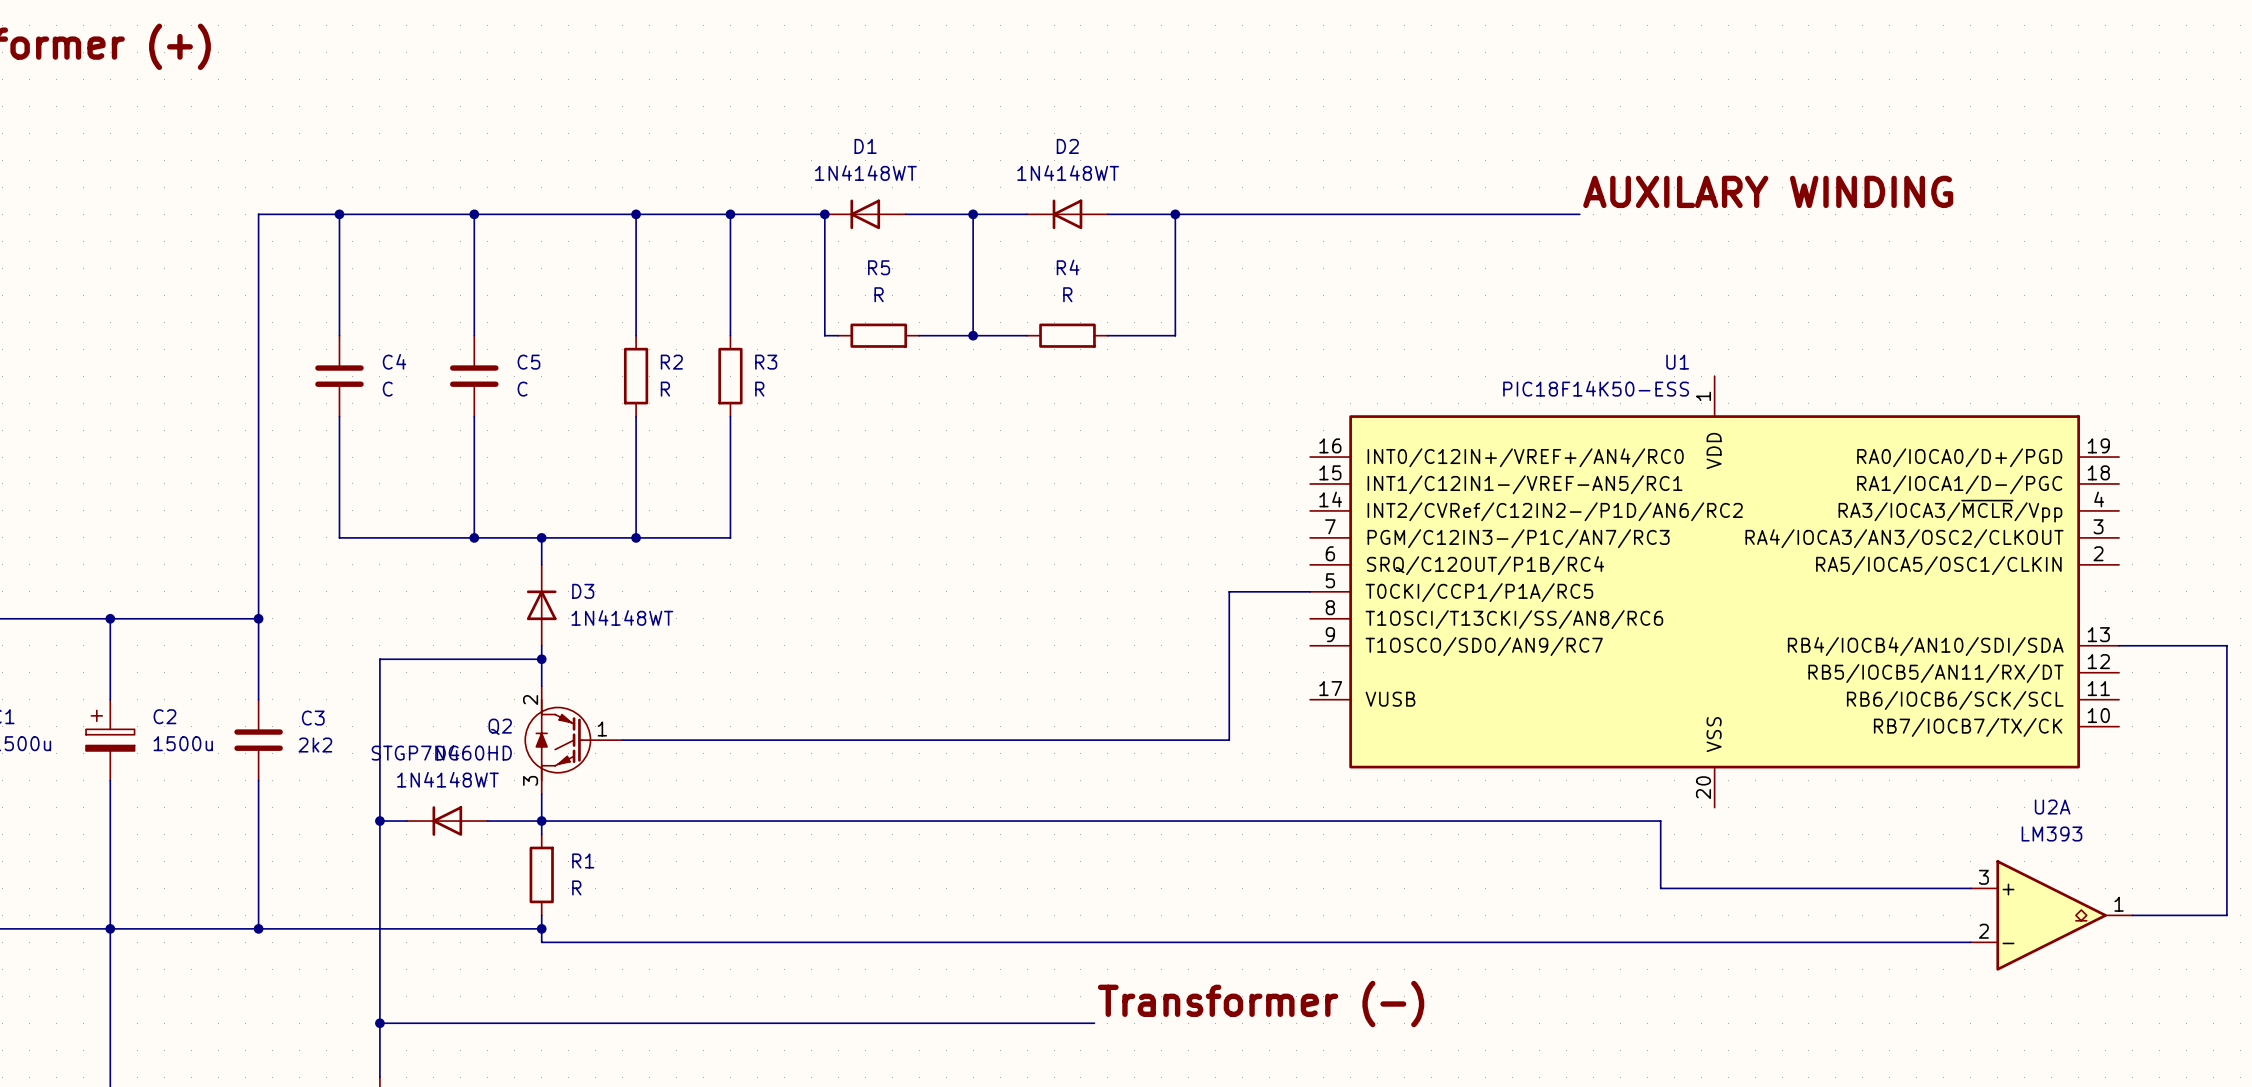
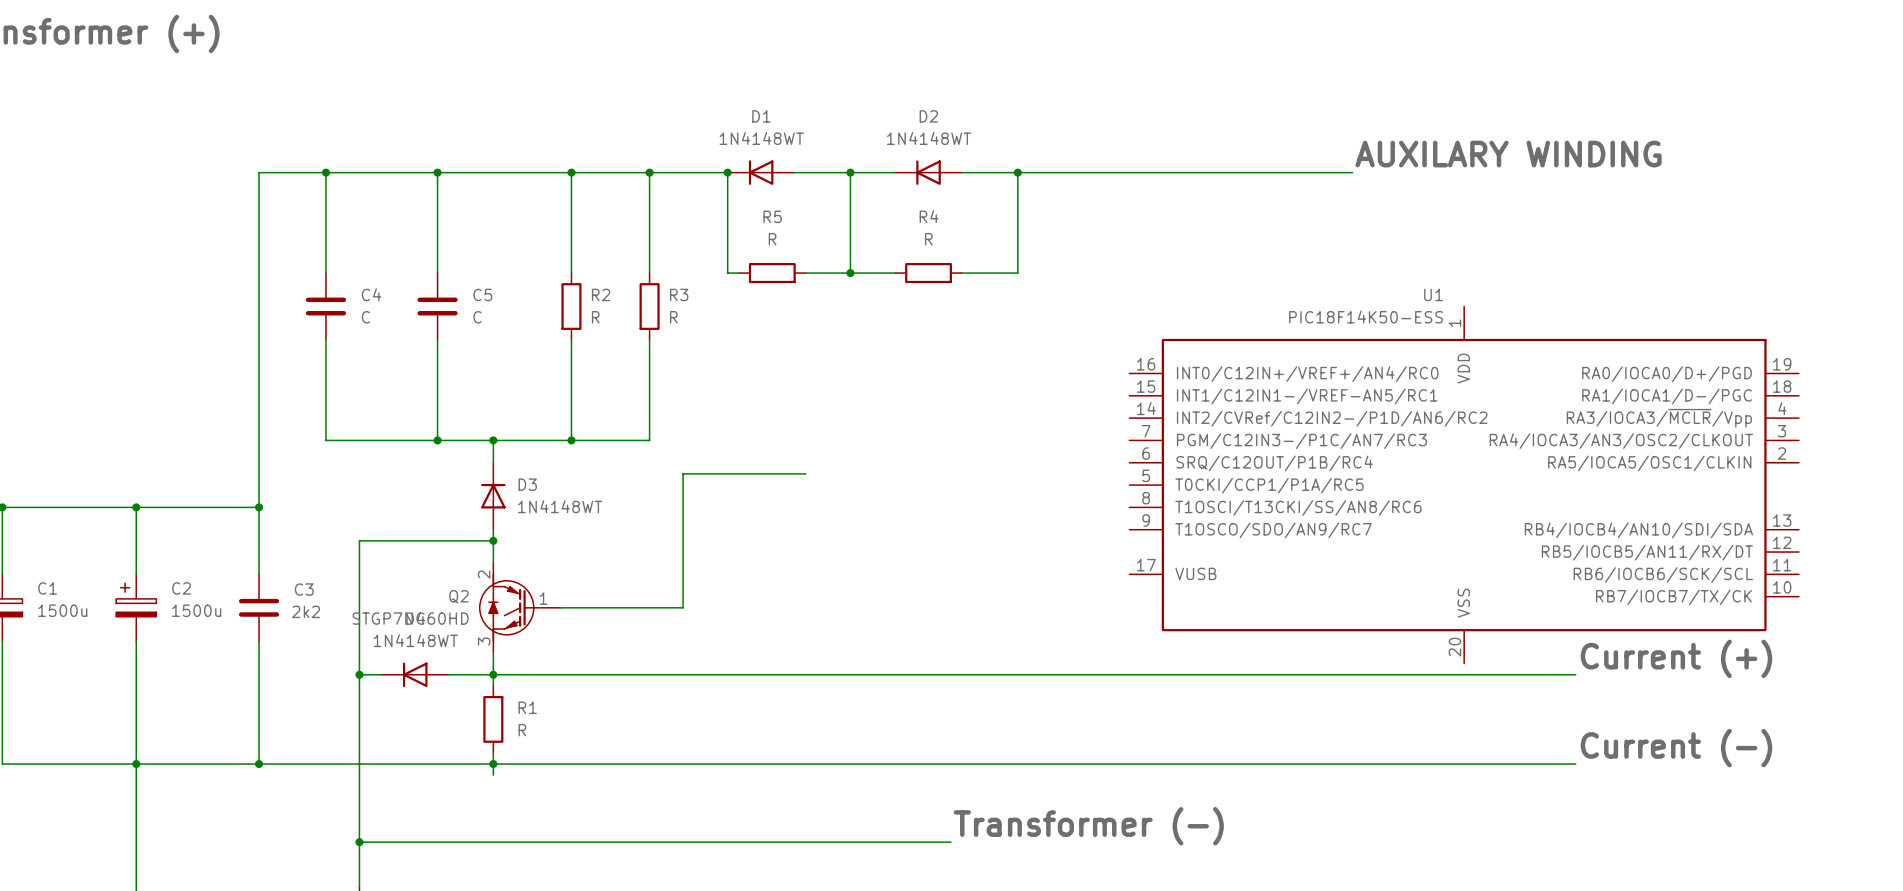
wire: (1310, 591) (1229, 591) (1229, 740) (770, 740) -> (805, 473) (683, 473) (683, 607)
wire: (2119, 645) (2226, 645) (2226, 915) (2132, 915) -> none
label: none -> Current (+) (1676, 658)
wire: (1660, 821) (1660, 888) (1970, 888) -> (1419, 674) (1575, 674)
label: none -> Current (-) (1676, 748)
U2A: LM393 (2051, 915) -> none
wire: none -> (493, 764) (1575, 764)
wire: (541, 942) (1970, 942) -> none

